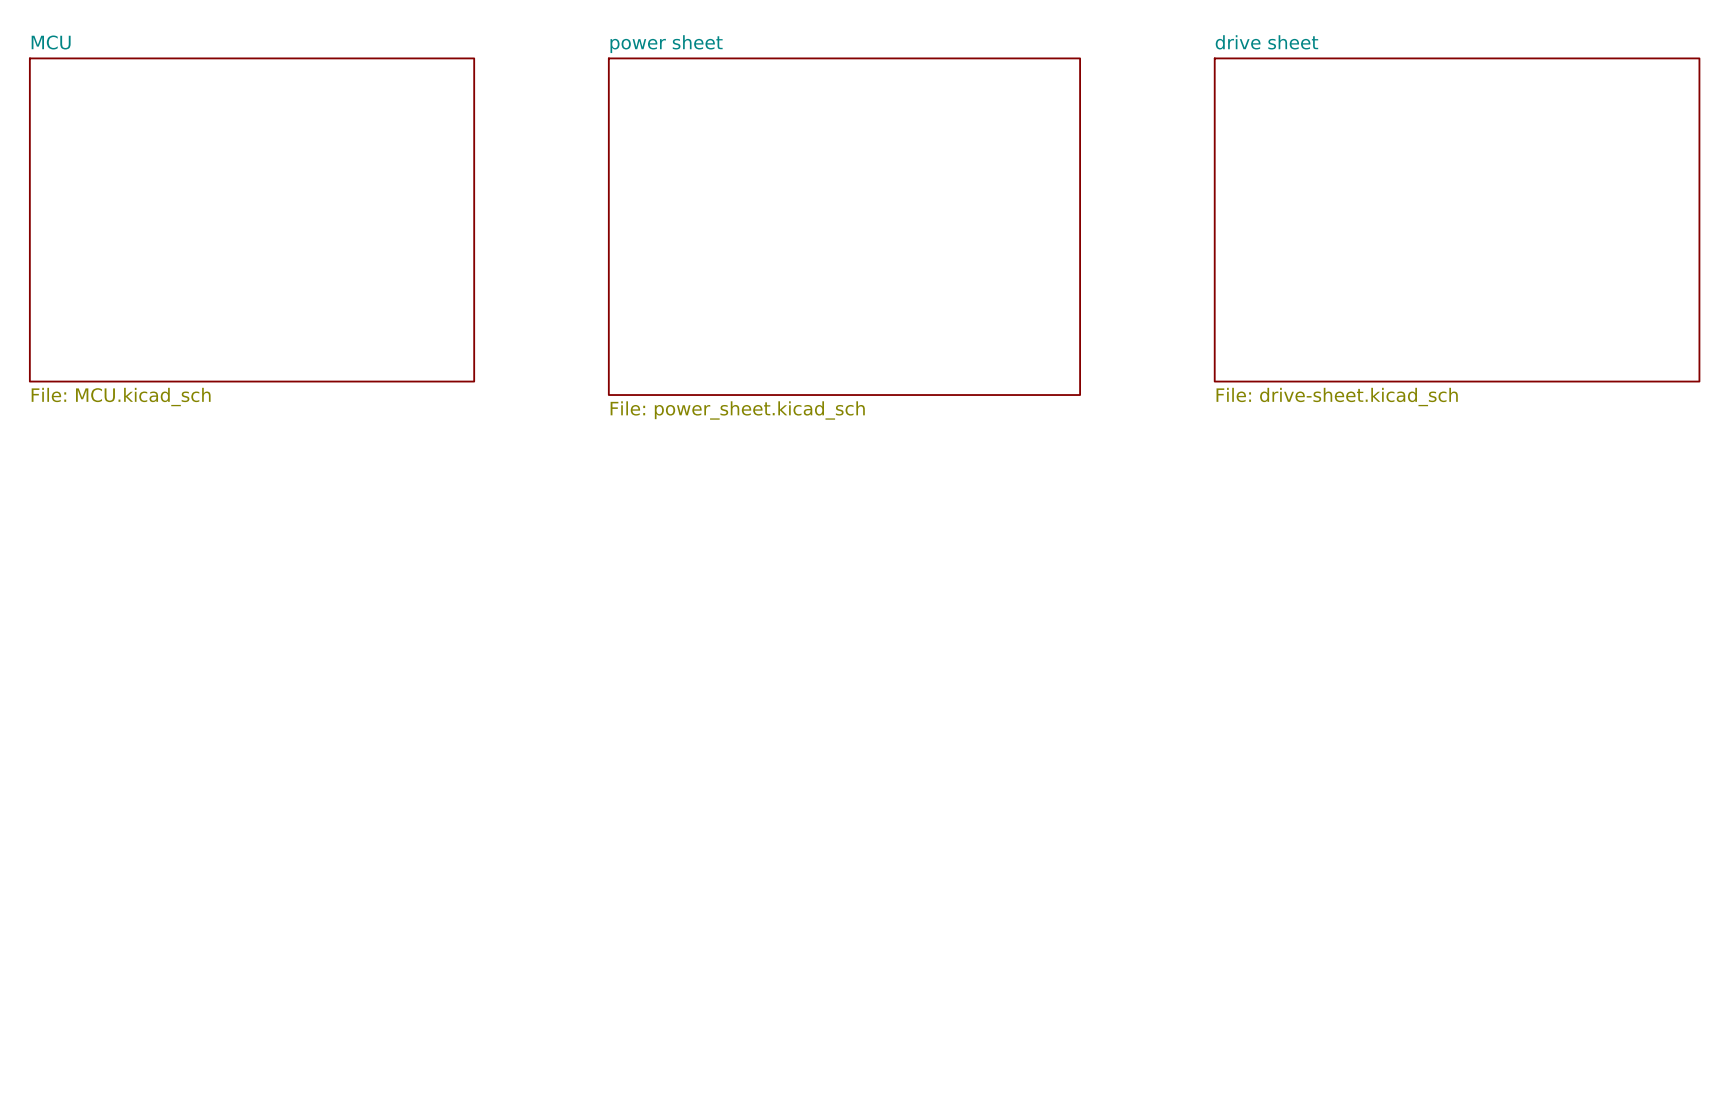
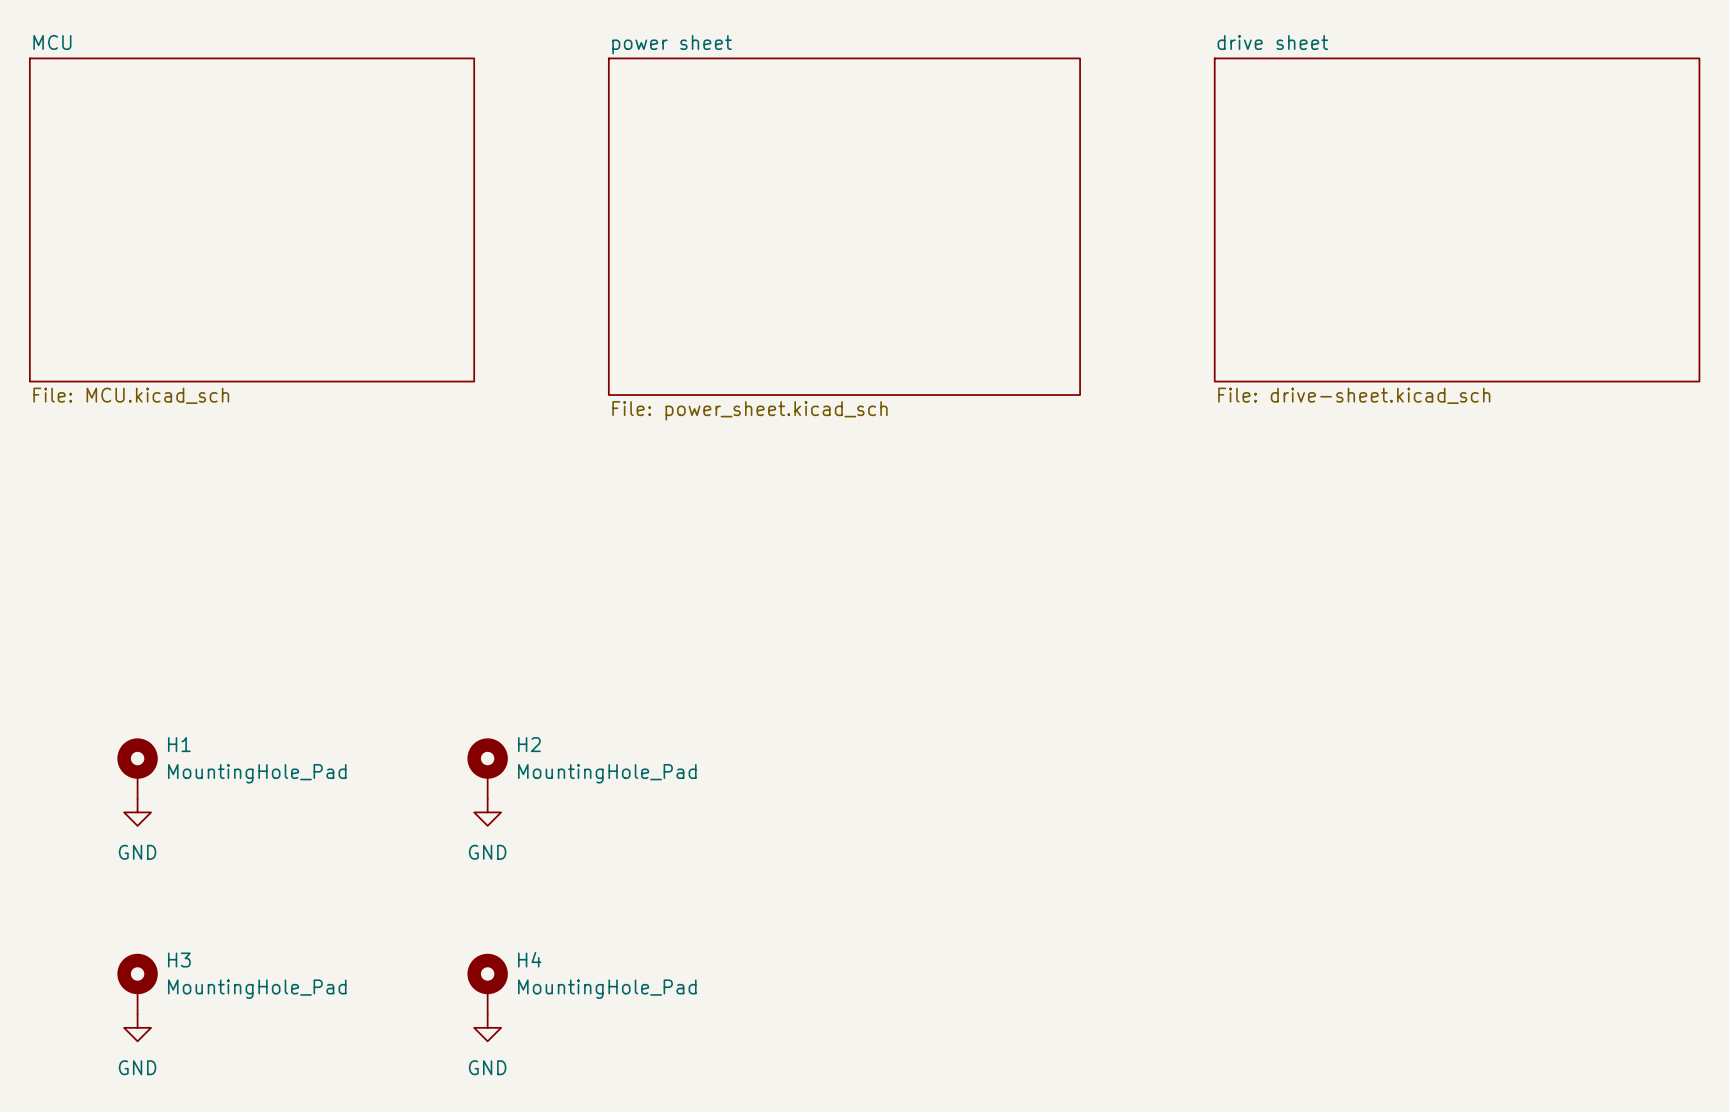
H1: none -> MountingHole_Pad (137, 768)
H2: none -> MountingHole_Pad (487, 768)
power symbol: none -> GND (137, 812)
power symbol: none -> GND (487, 812)
H3: none -> MountingHole_Pad (137, 984)
H4: none -> MountingHole_Pad (487, 984)
power symbol: none -> GND (137, 1027)
power symbol: none -> GND (487, 1027)

